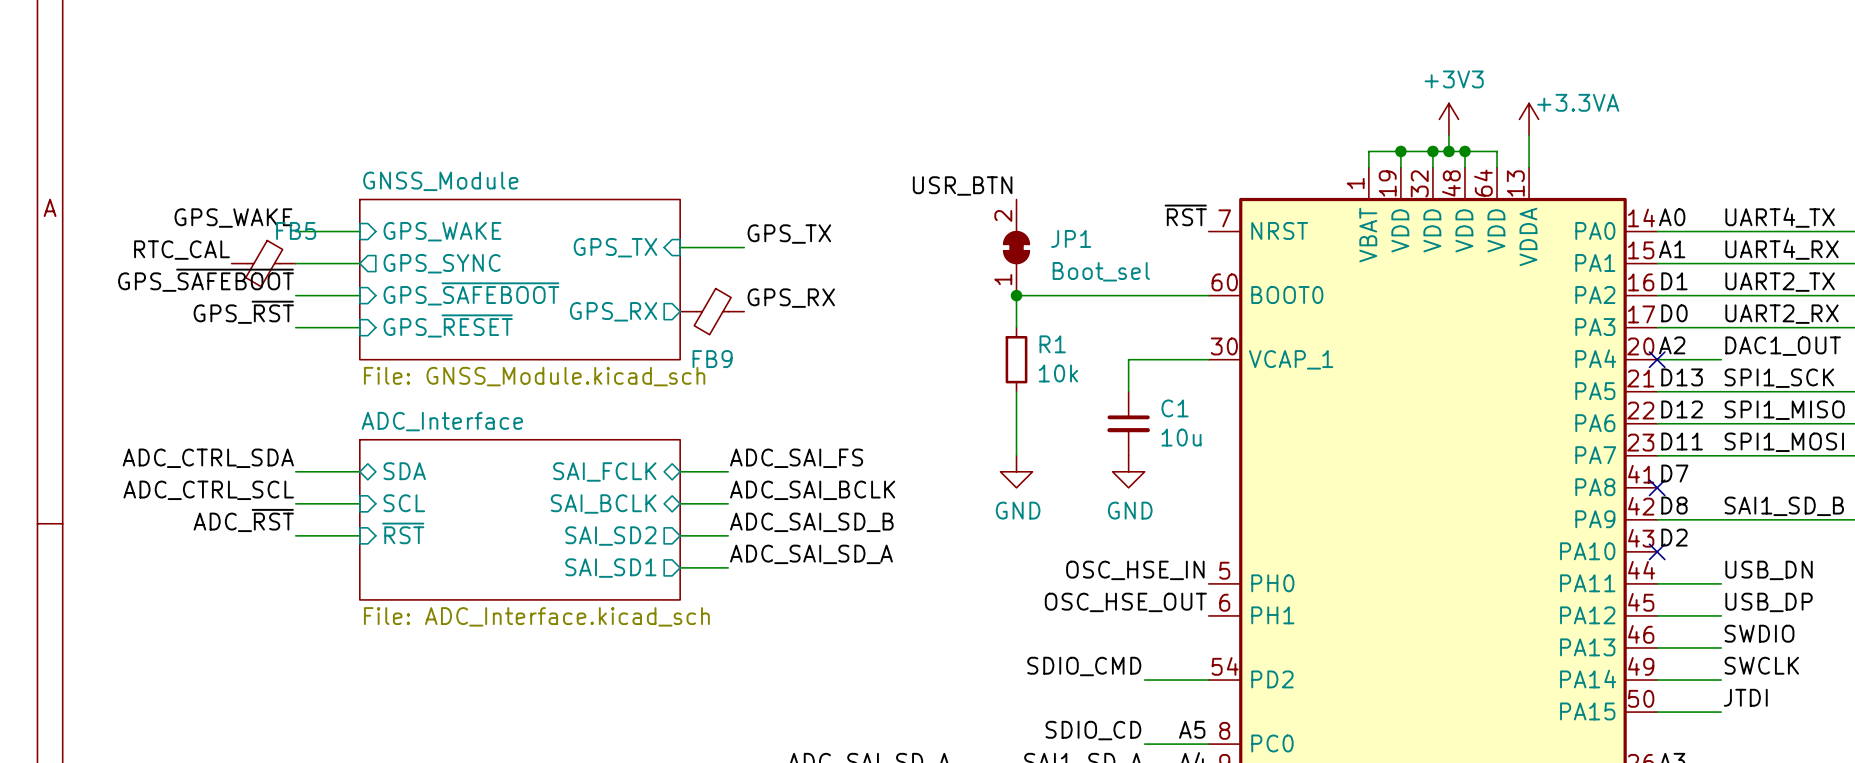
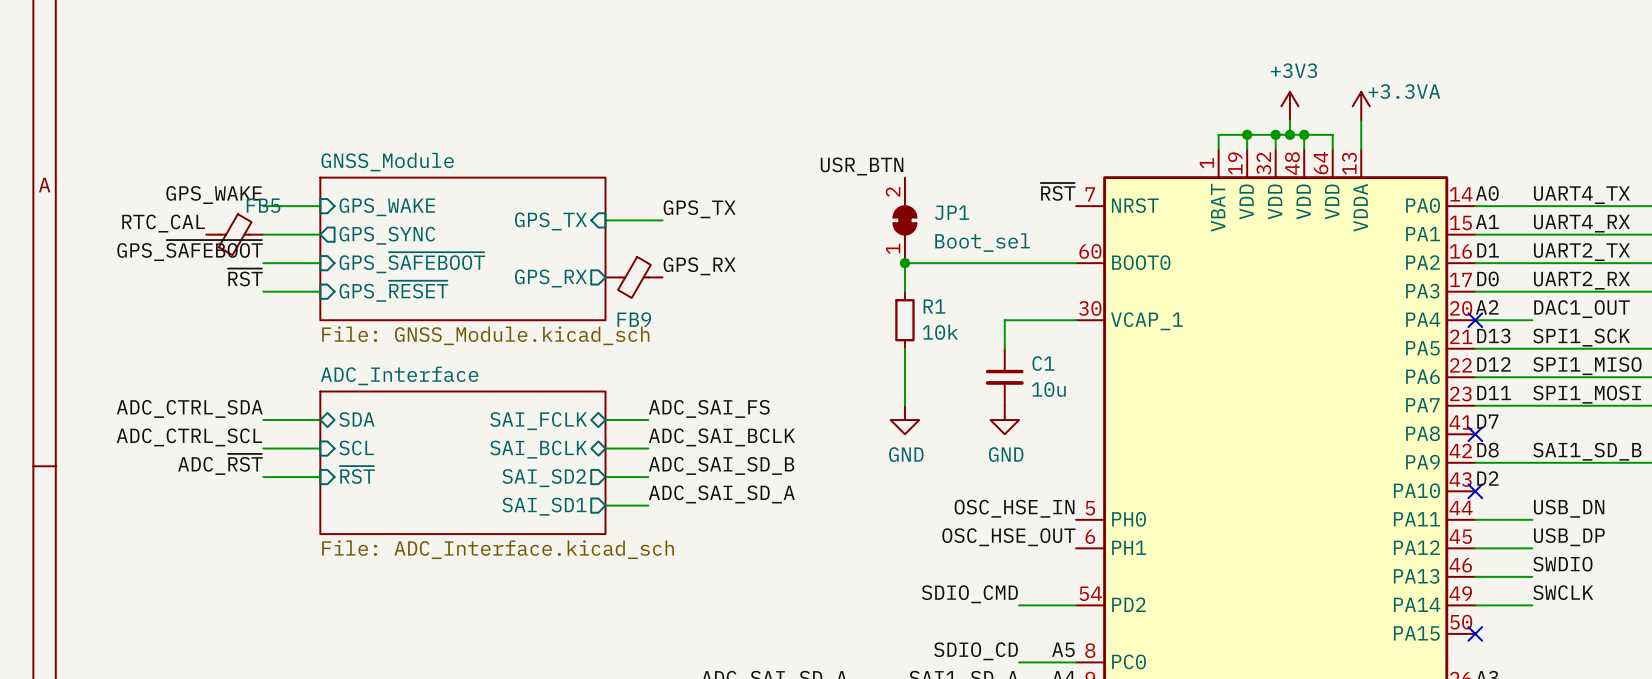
label: GPS_~{RST} (243, 312) -> ~{RST} (245, 277)
label: JTDI (1745, 697) -> none
wire: (1657, 712) (1721, 712) -> none
no-connect mark: none -> (1475, 633)

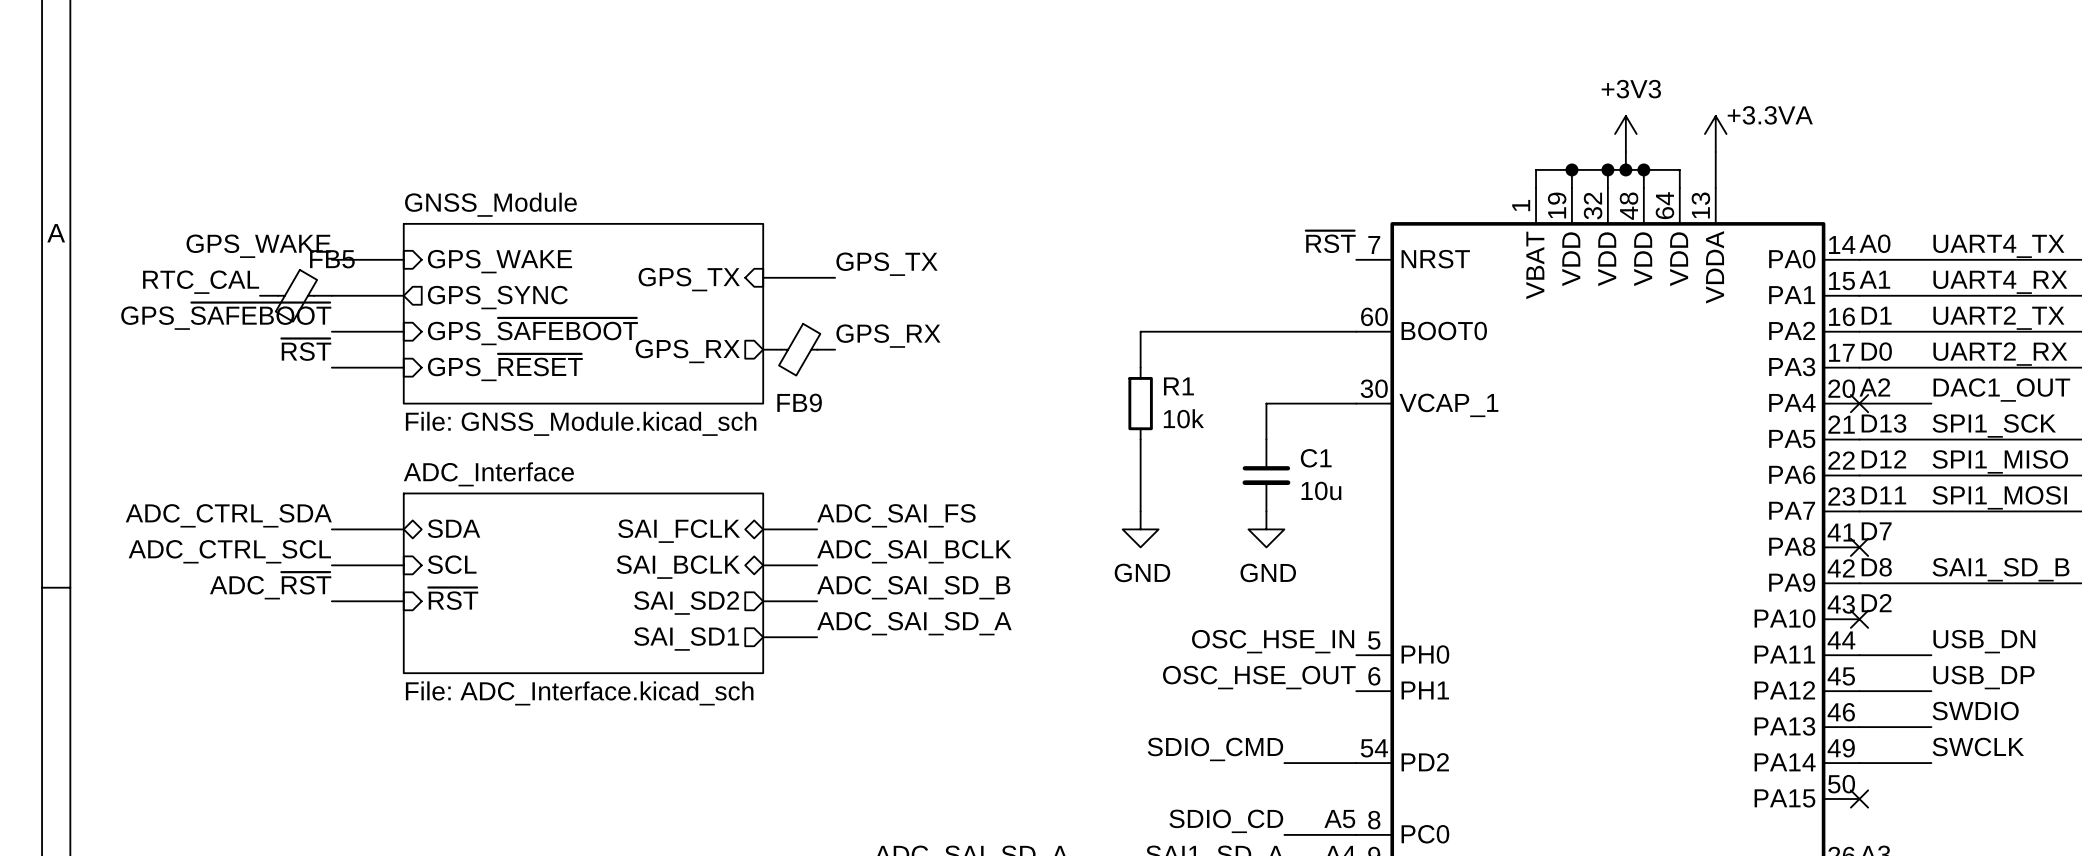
label: USR_BTN (862, 166) -> none
JP1: Boot_sel (904, 220) -> none
junction: (904, 263) -> none

